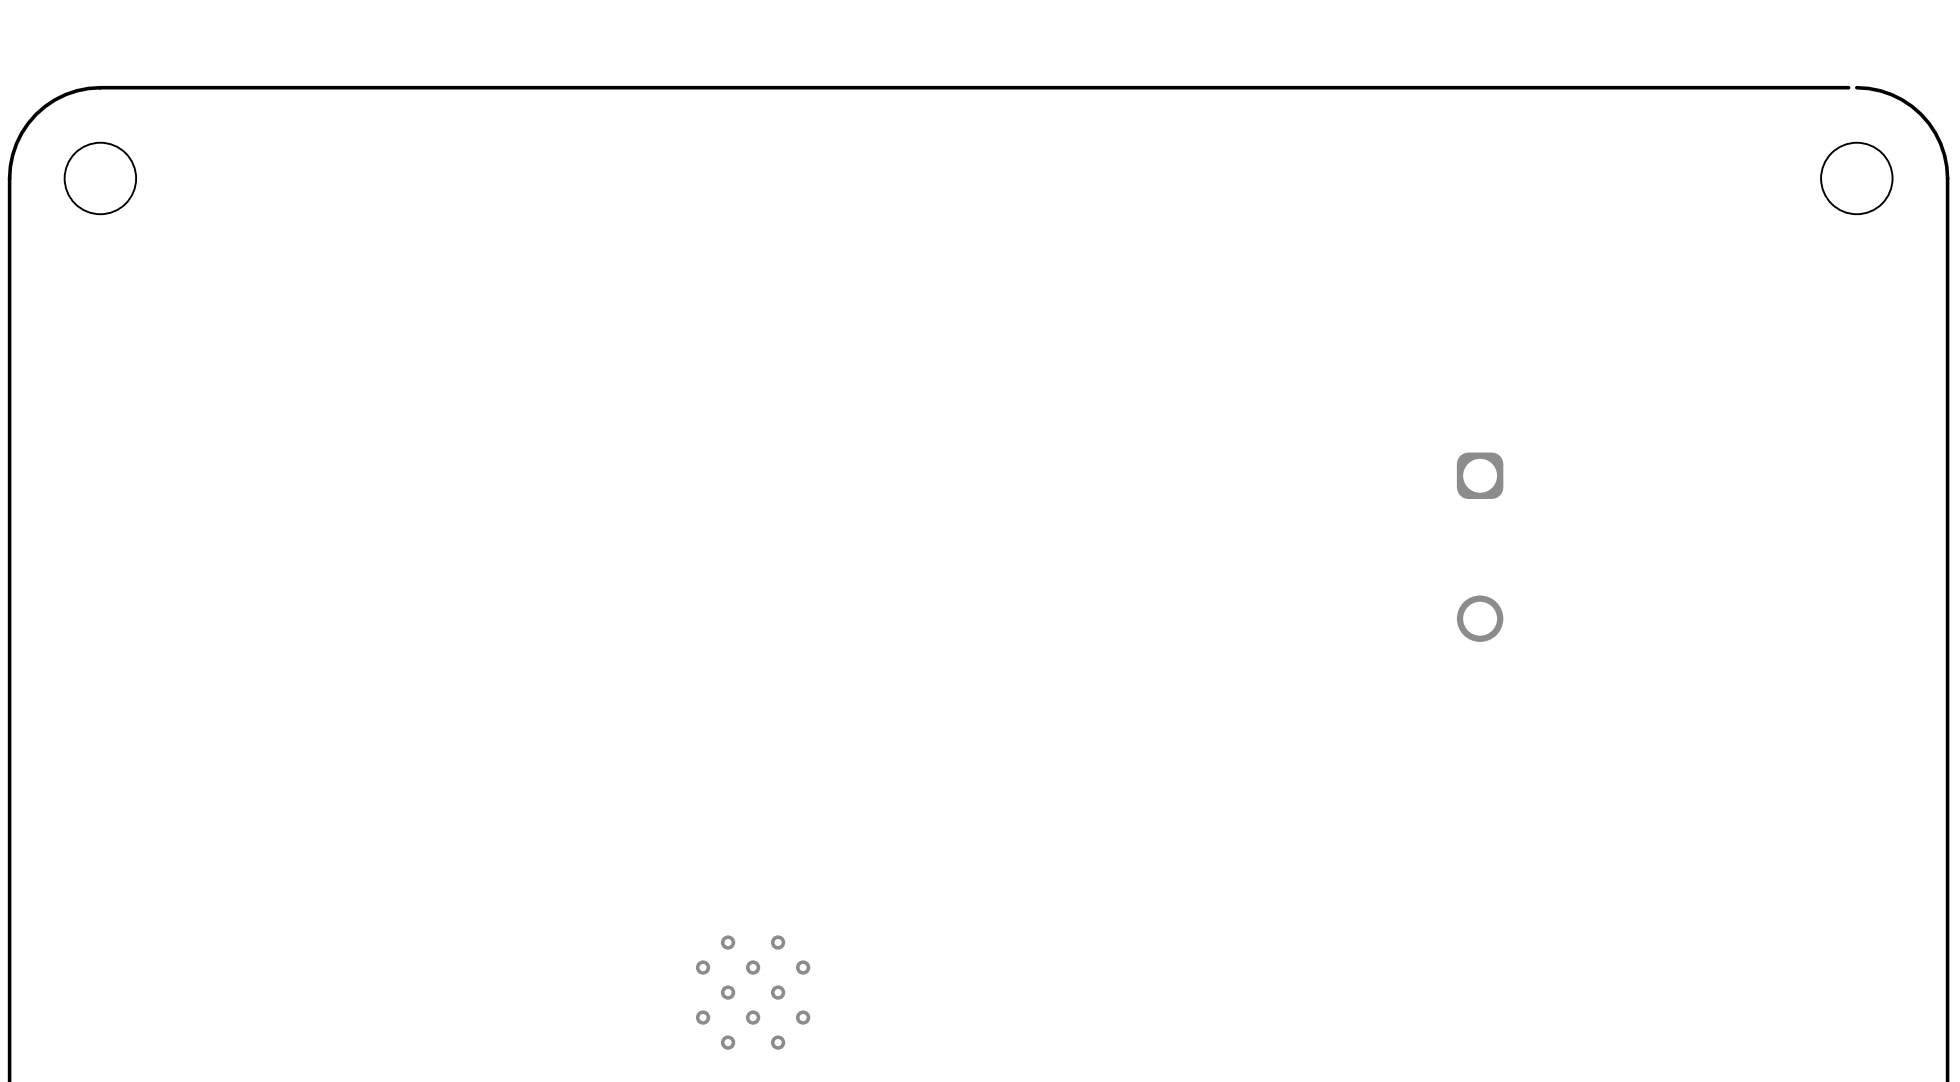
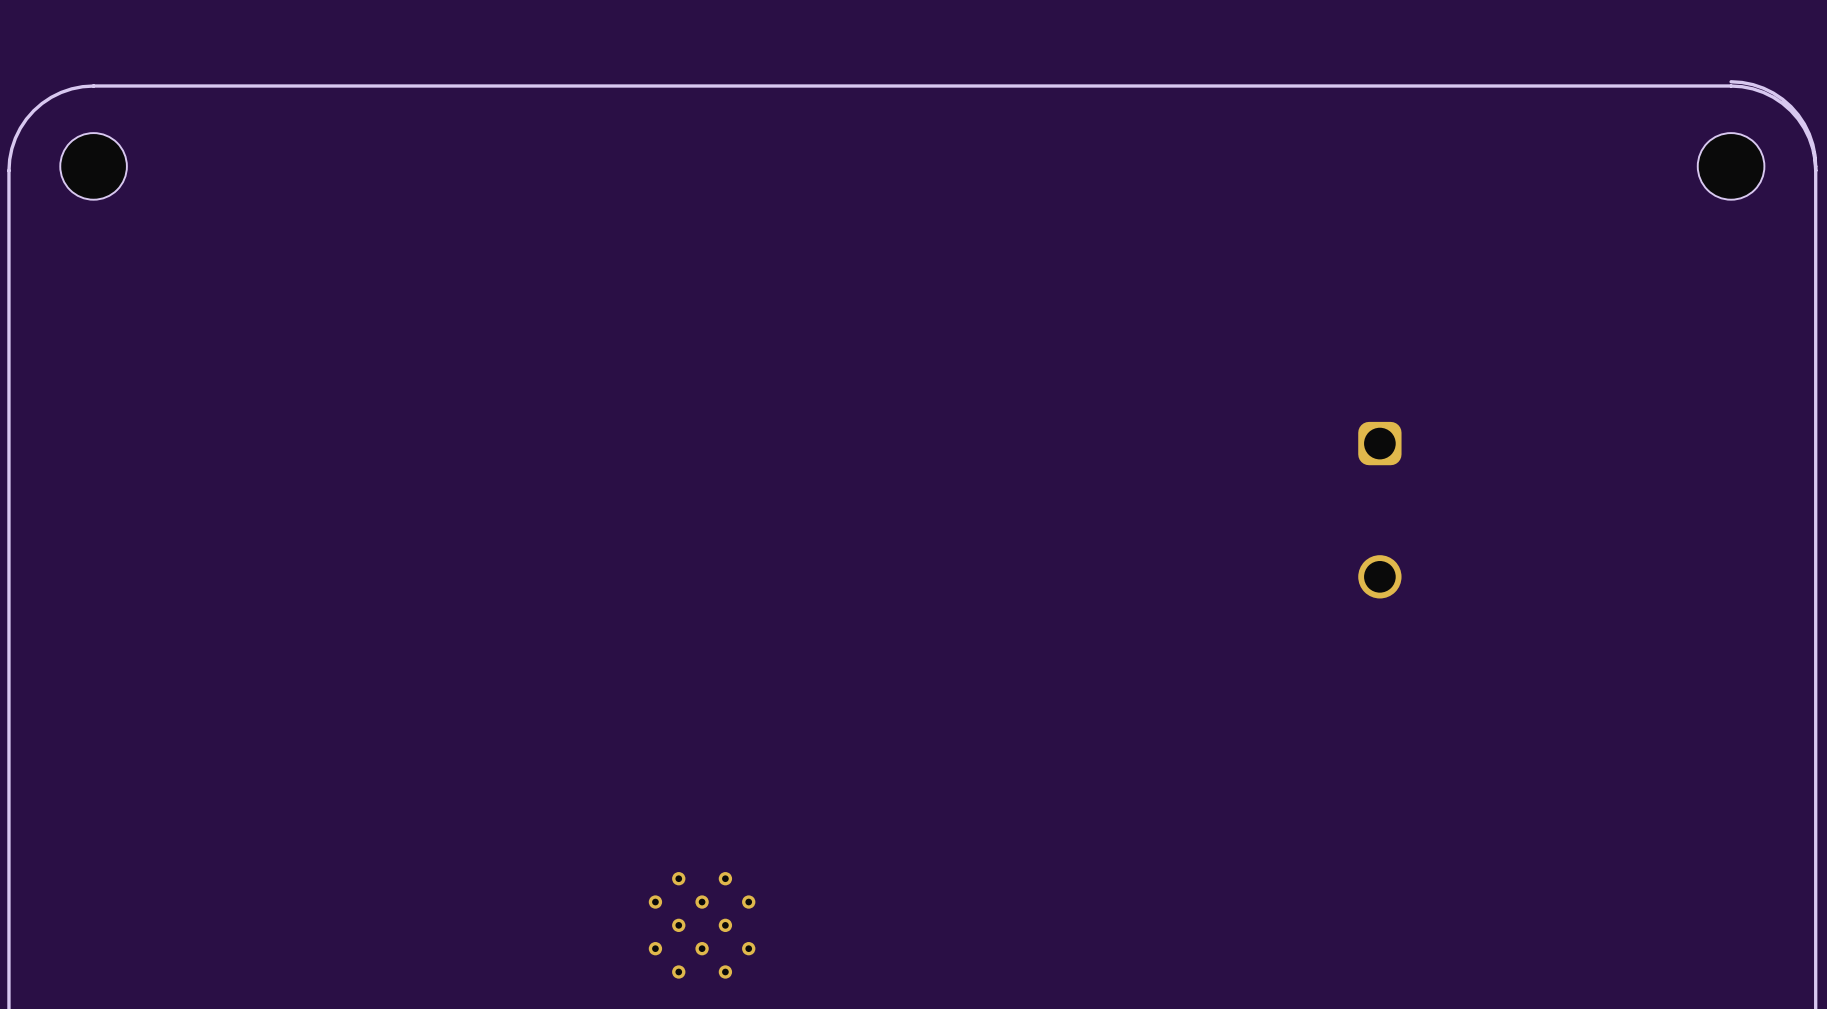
board edge: (1848, 87) (100, 87) (76, 90) (65, 94) (45, 106) (36, 114) (21, 133) (16, 143) (10, 166) (9, 183) -> (1815, 170) (1809, 138) (1790, 110) (1763, 92) (1731, 86) (93, 86) (61, 92) (33, 110) (15, 138) (8, 170)

